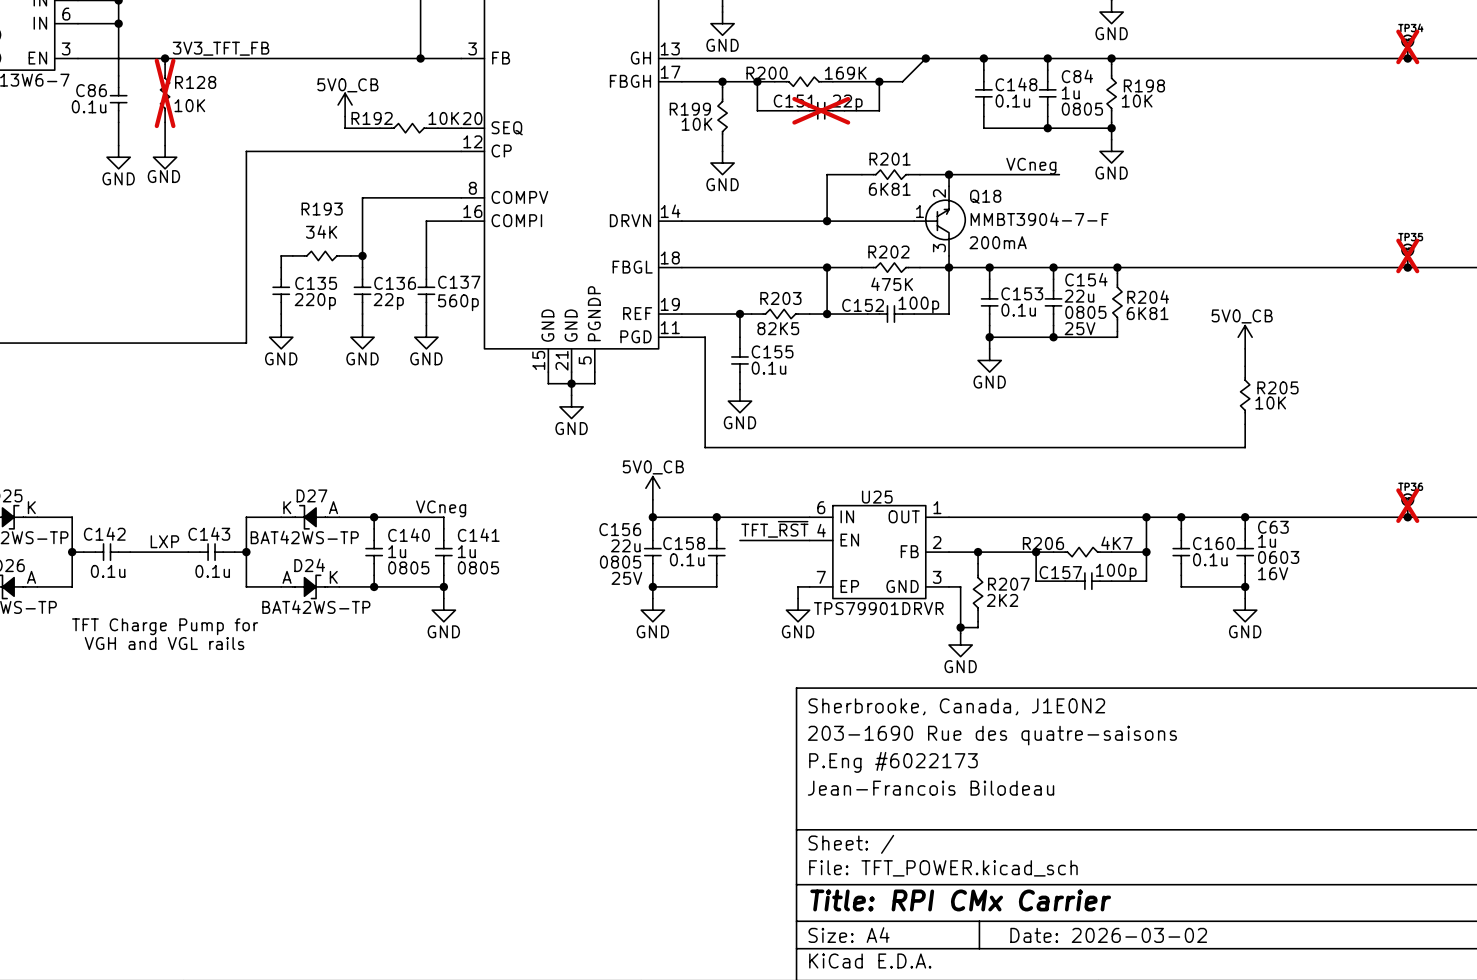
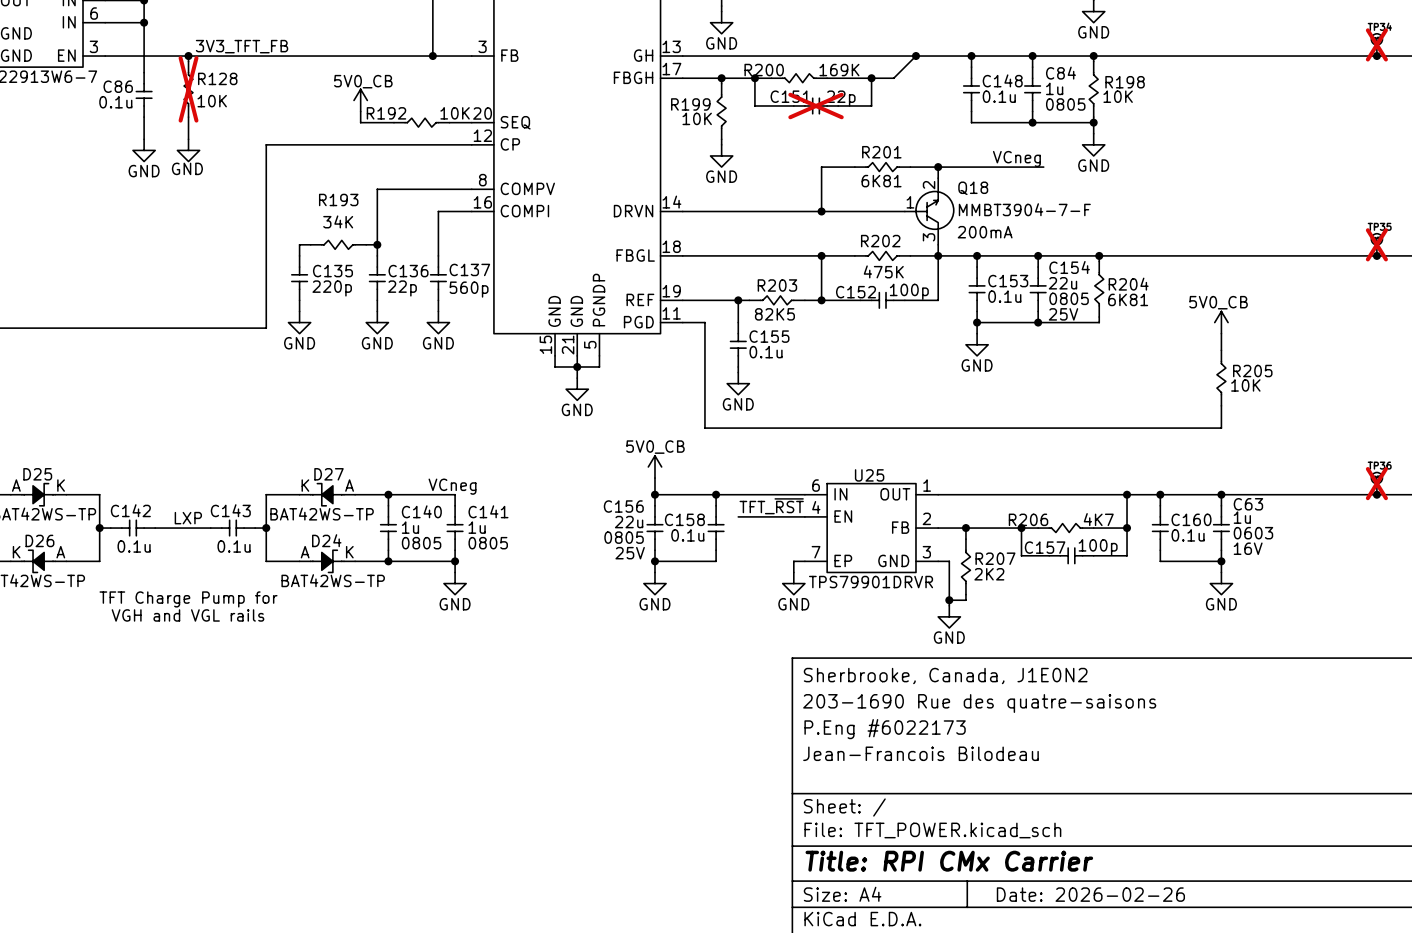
title block: Date: 2026-03-02 (1108, 935) -> Date: 2026-02-26 (1090, 894)

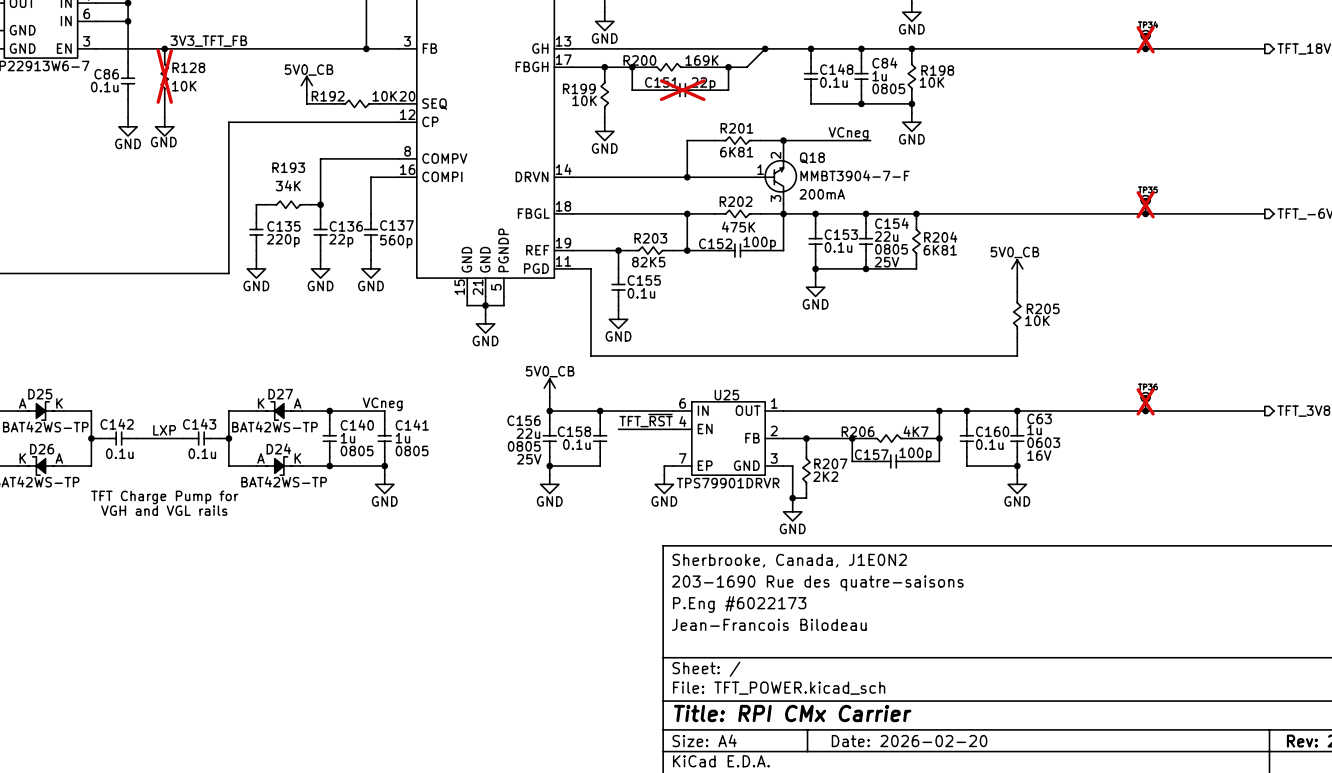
title block: Date: 2026-02-26 (1090, 894) -> Date: 2026-02-20 (909, 741)

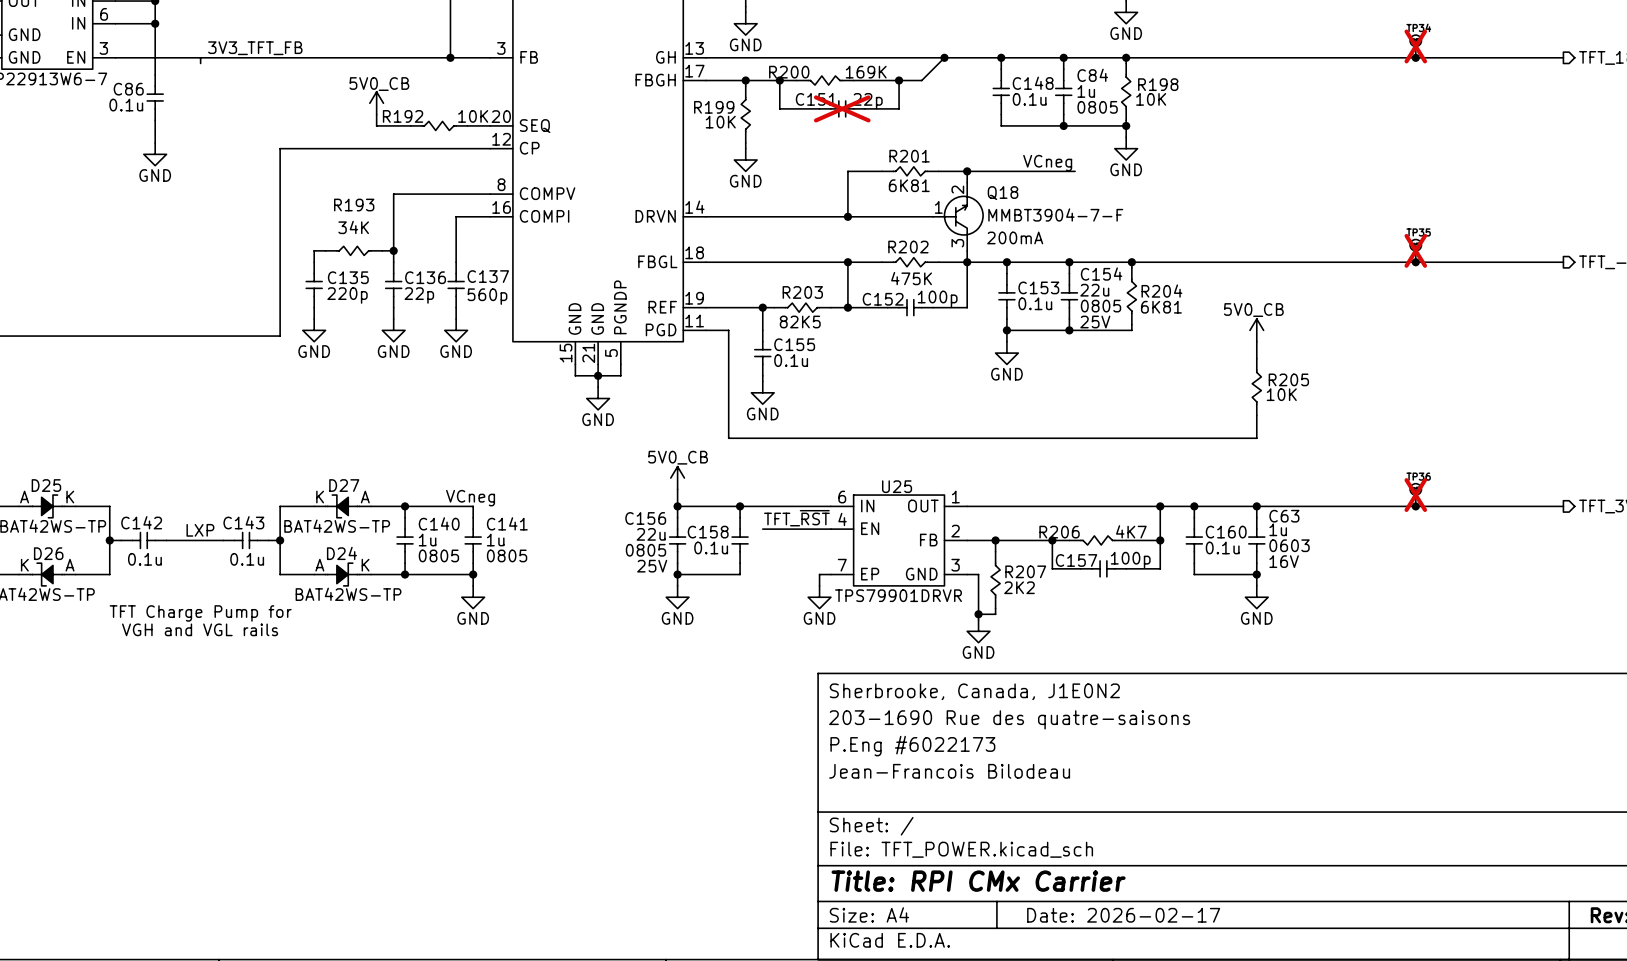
junction: (164, 48) -> none
R128: 10K (164, 76) -> none
wire: (164, 99) (164, 117) -> none
power symbol: GND (164, 126) -> none
title block: Date: 2026-02-20 (909, 741) -> Date: 2026-02-17 (1123, 915)

